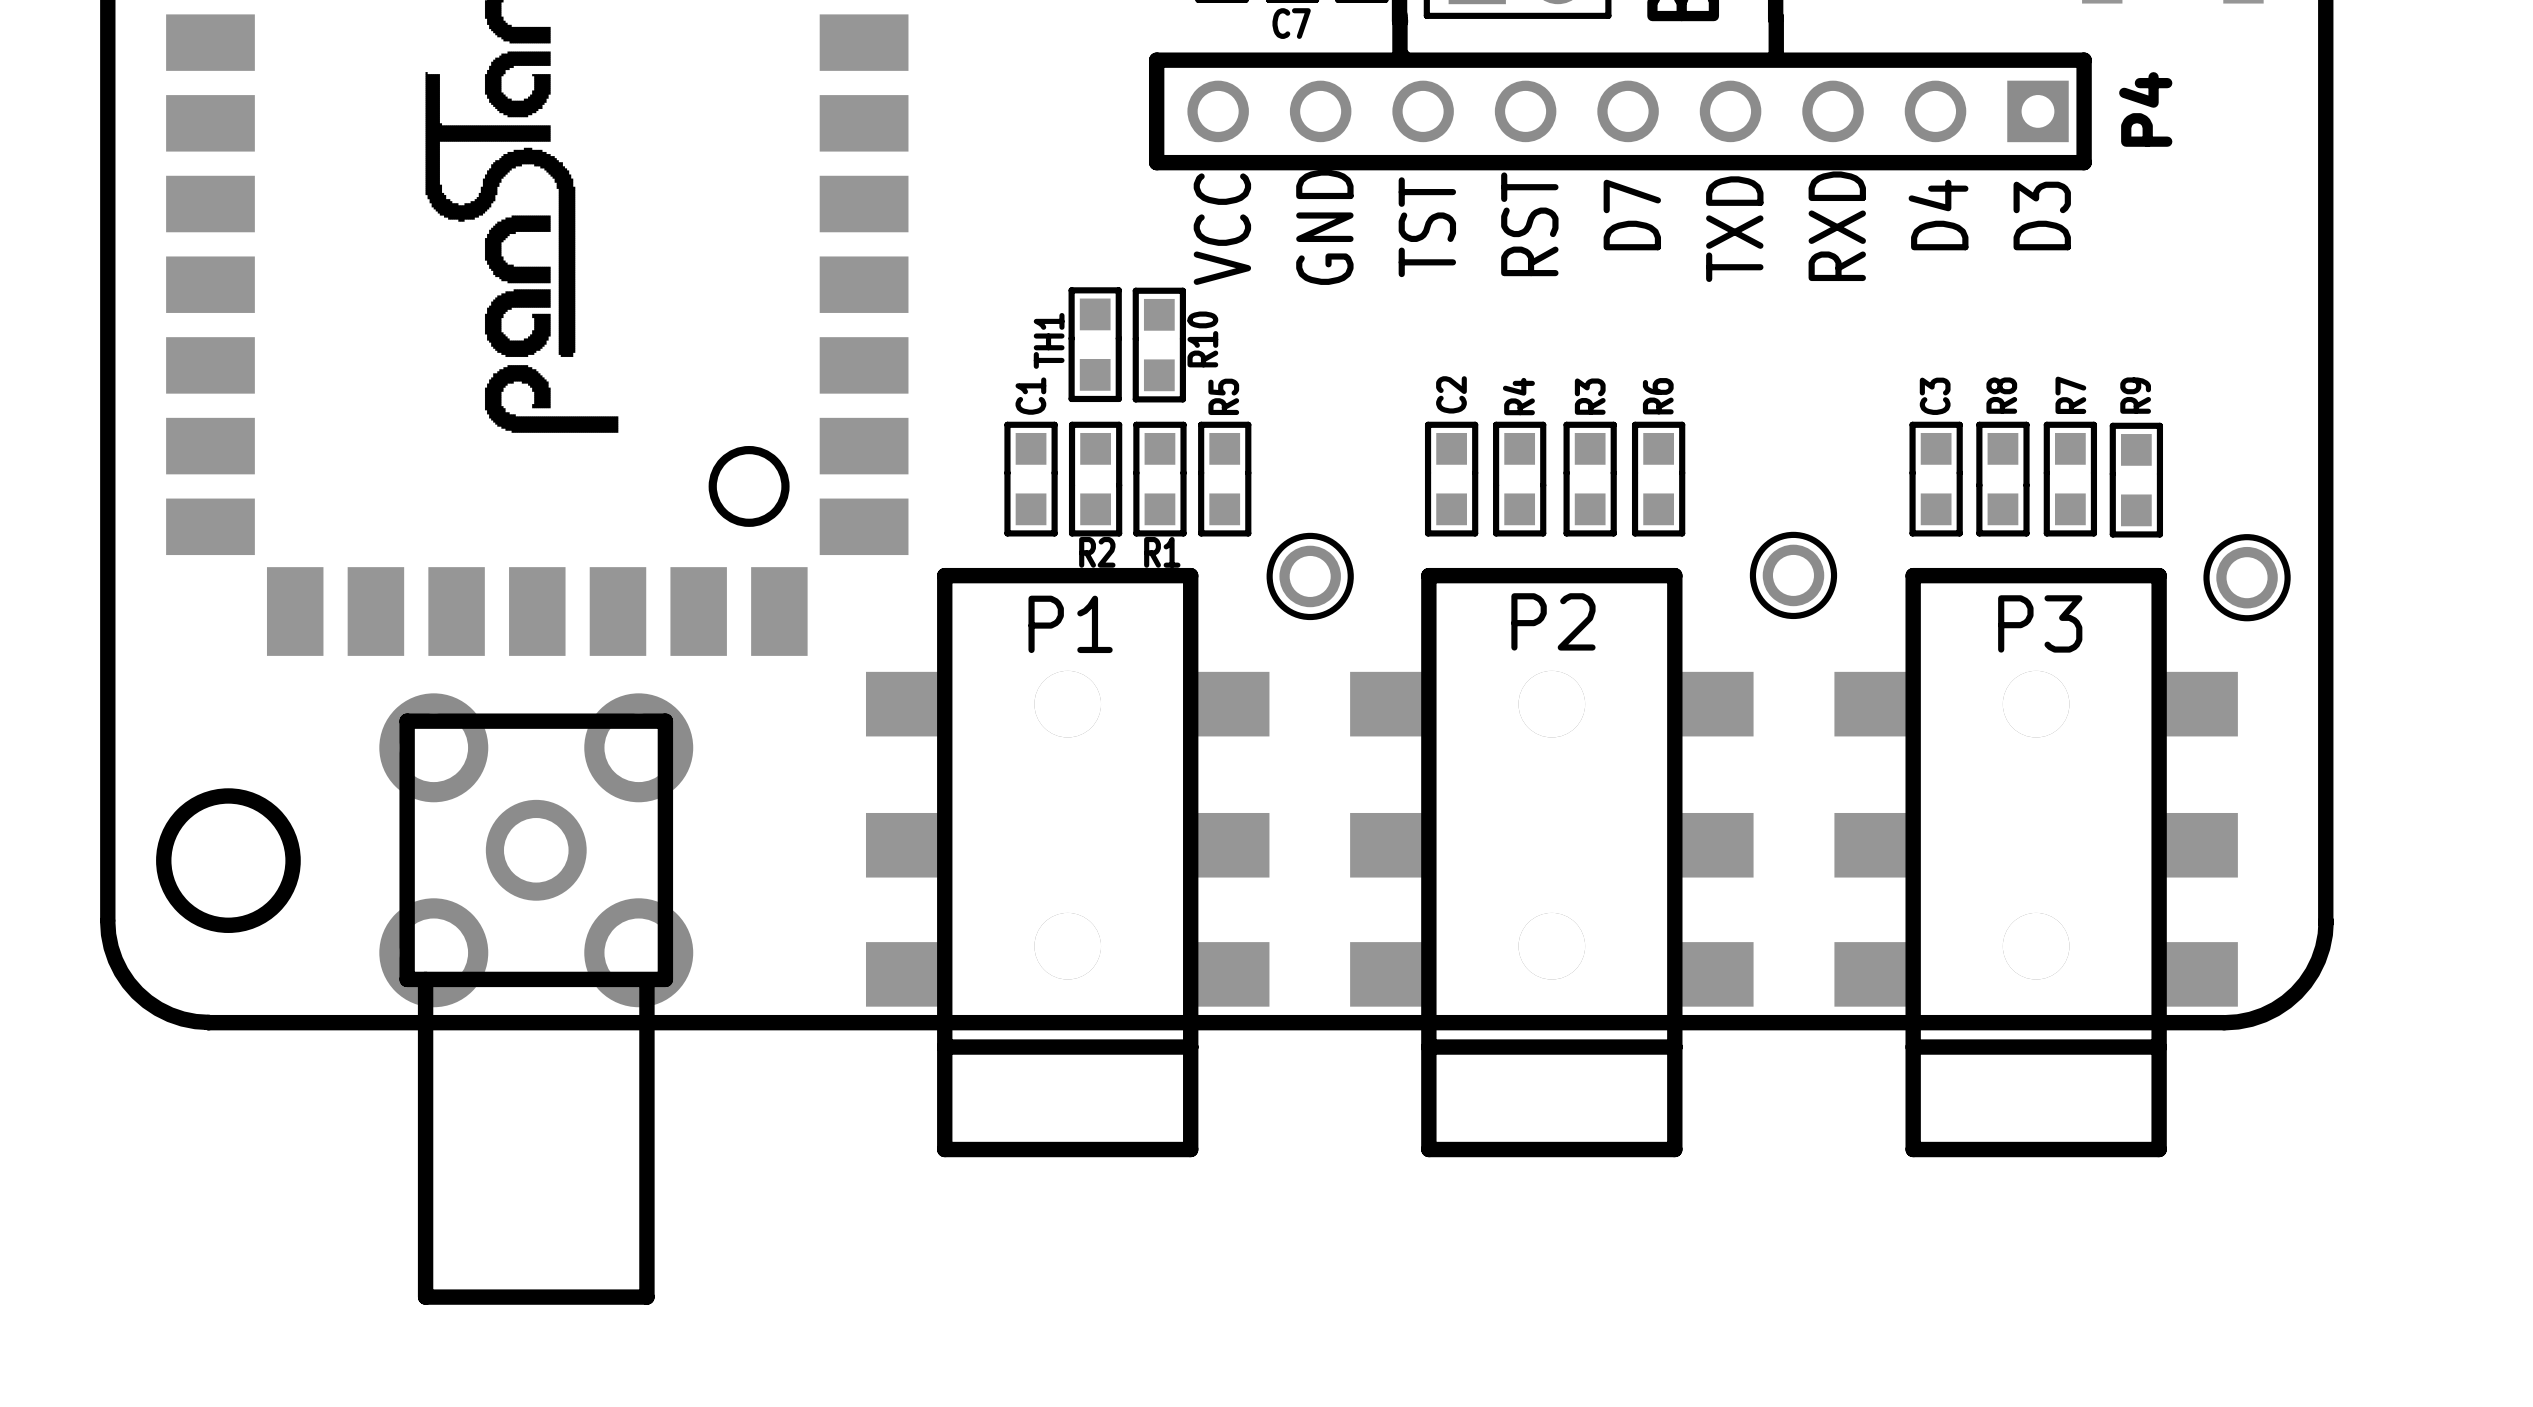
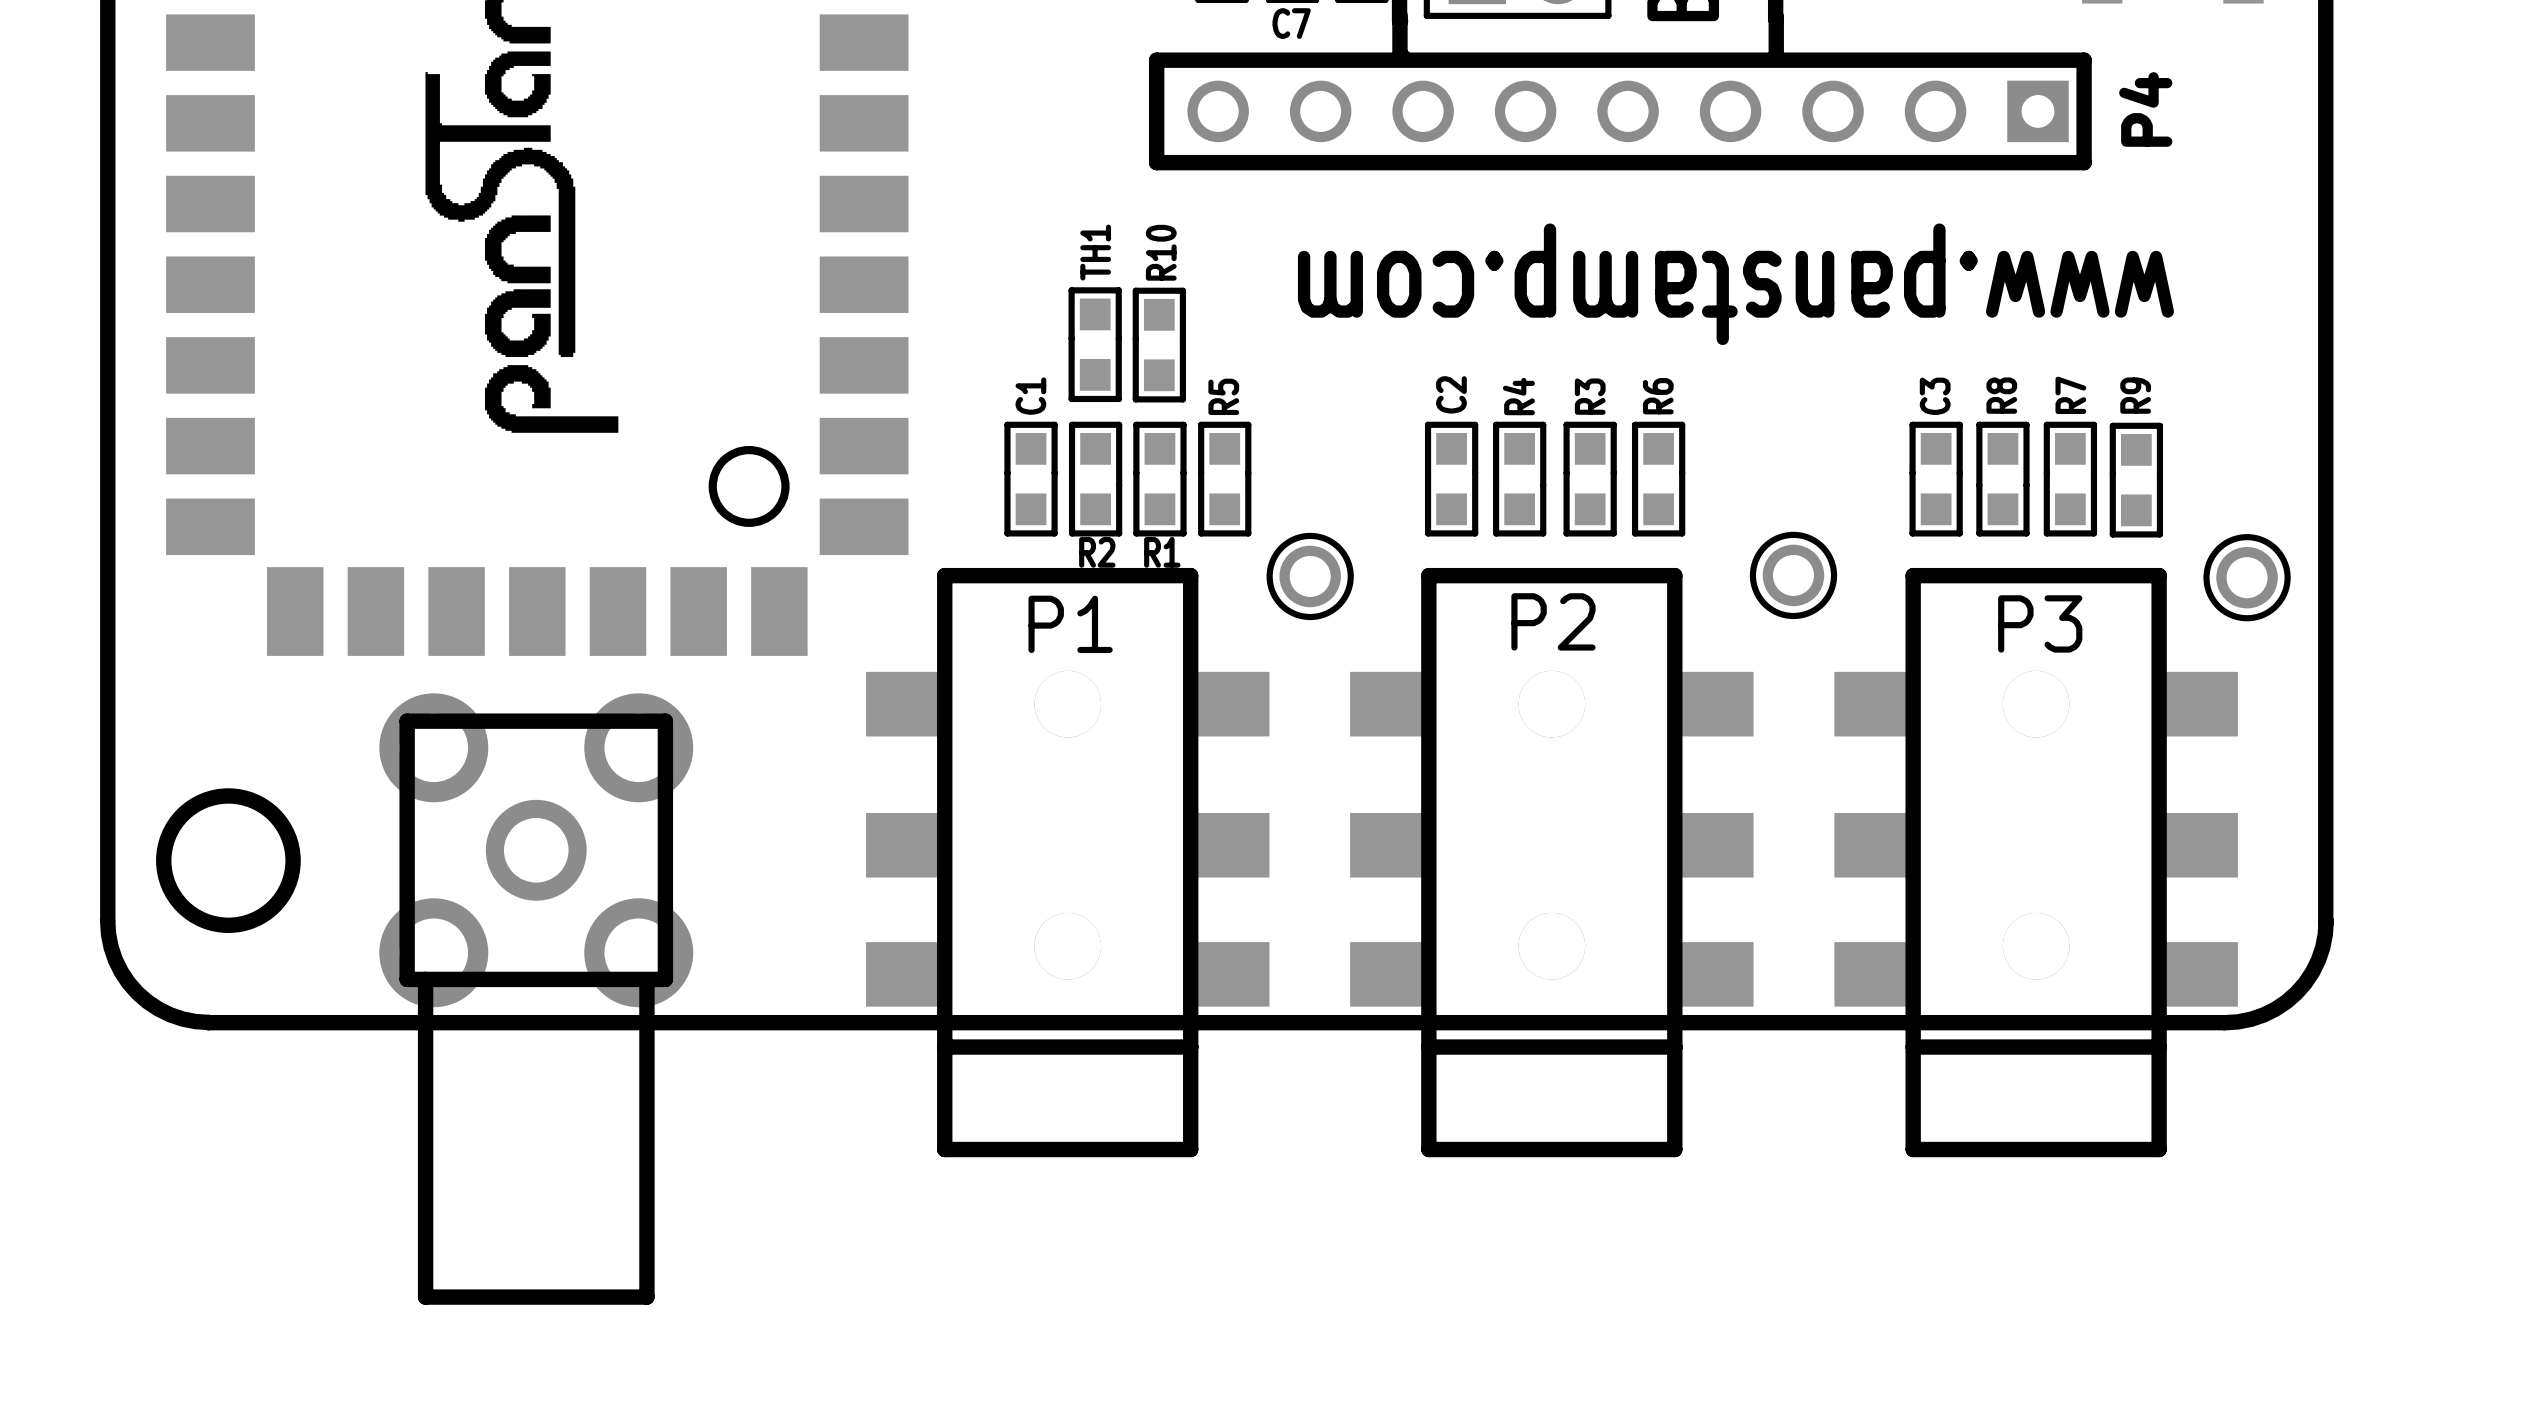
text: D7 (1632, 215) -> none
text: D4 (1938, 215) -> none
text: D3 (2042, 215) -> none
text: RST (1529, 224) -> none
text: RXD (1837, 226) -> none
text: GND (1324, 227) -> none
text: TST (1427, 227) -> none
text: VCC (1222, 229) -> none
text: TXD (1734, 229) -> none
text: none -> www.panstamp.com (1735, 284)
R10 name position: R10 (1202, 339) -> R10 (1161, 252)
TH1 name position: TH1 (1049, 340) -> TH1 (1095, 252)

